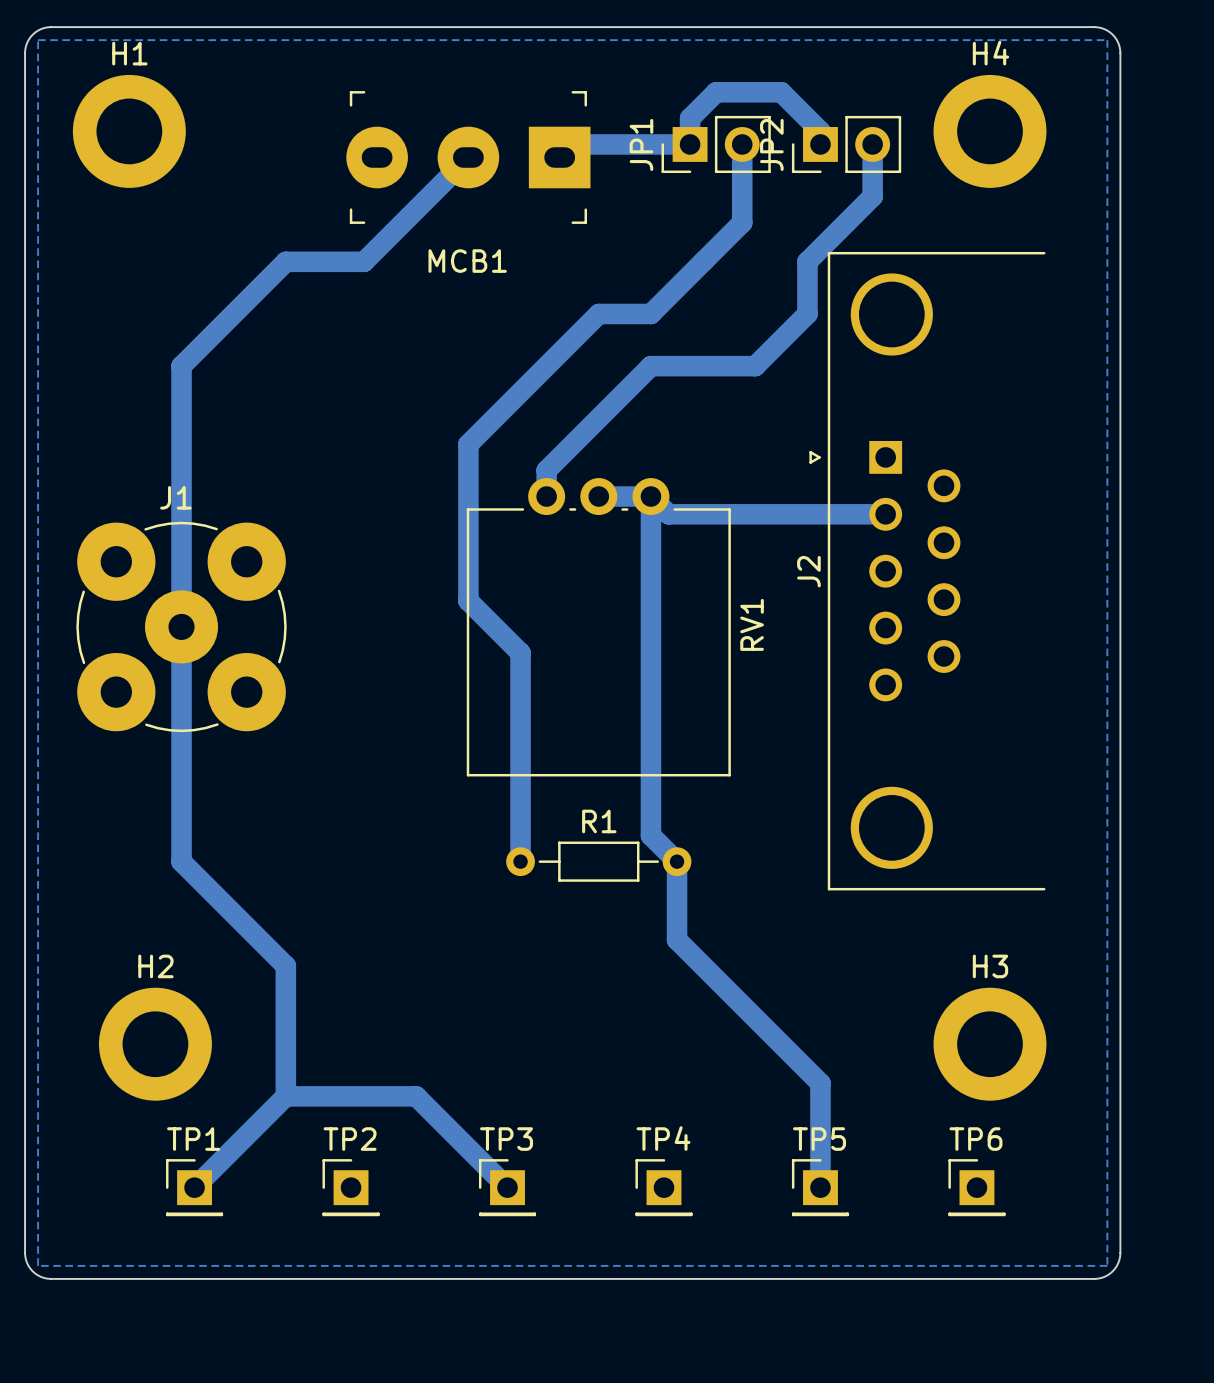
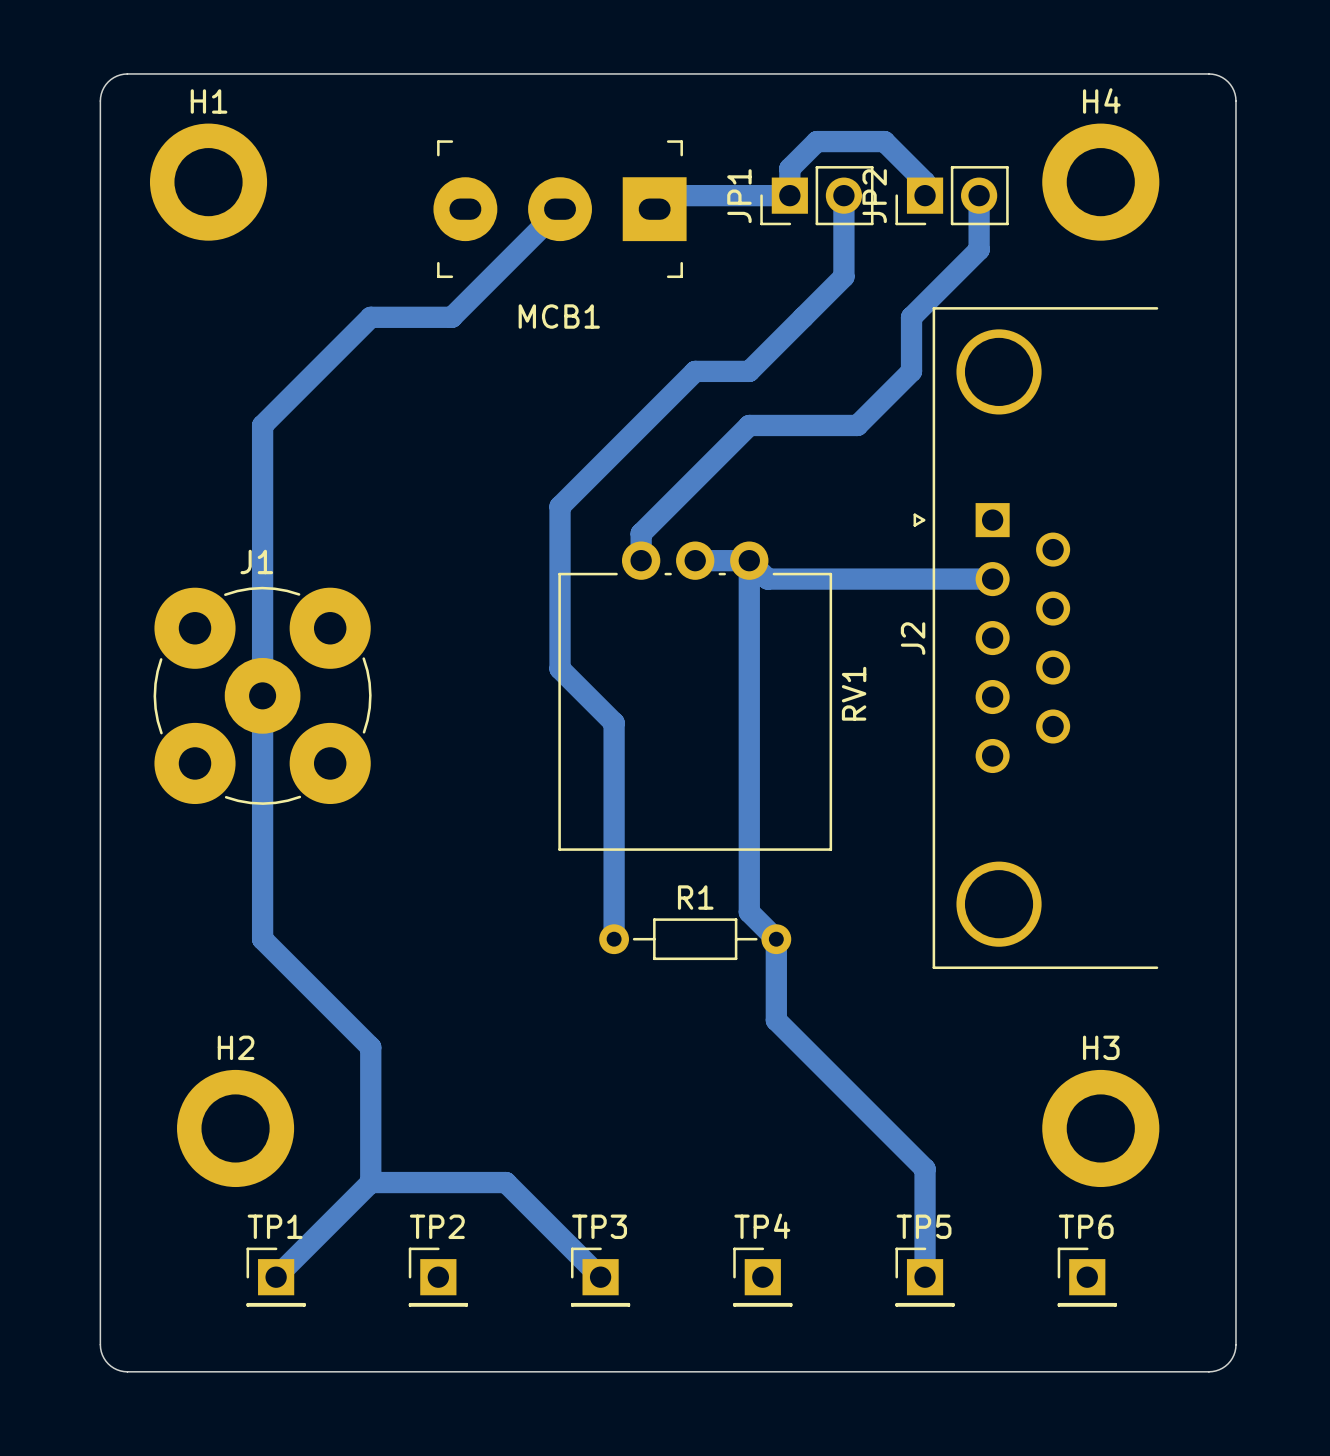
bottom zone outline: (38, 40) (1107, 40) (1107, 1265) (38, 1265) (38, 40) -> none

